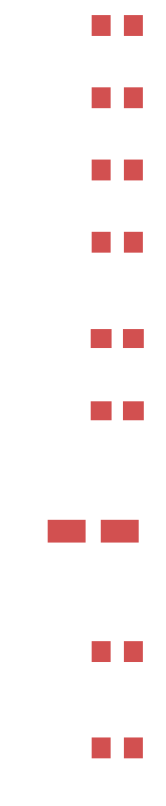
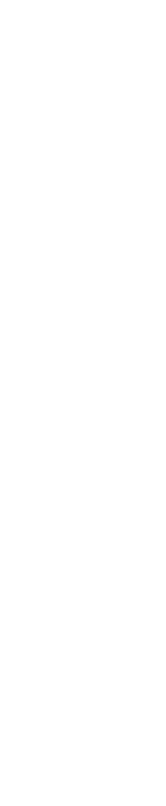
part: (117, 25) -> none
part: (117, 97) -> none
part: (117, 169) -> none
part: (117, 242) -> none
part: (117, 338) -> none
part: (117, 410) -> none
part: (93, 531) -> none
part: (117, 651) -> none
part: (117, 747) -> none

